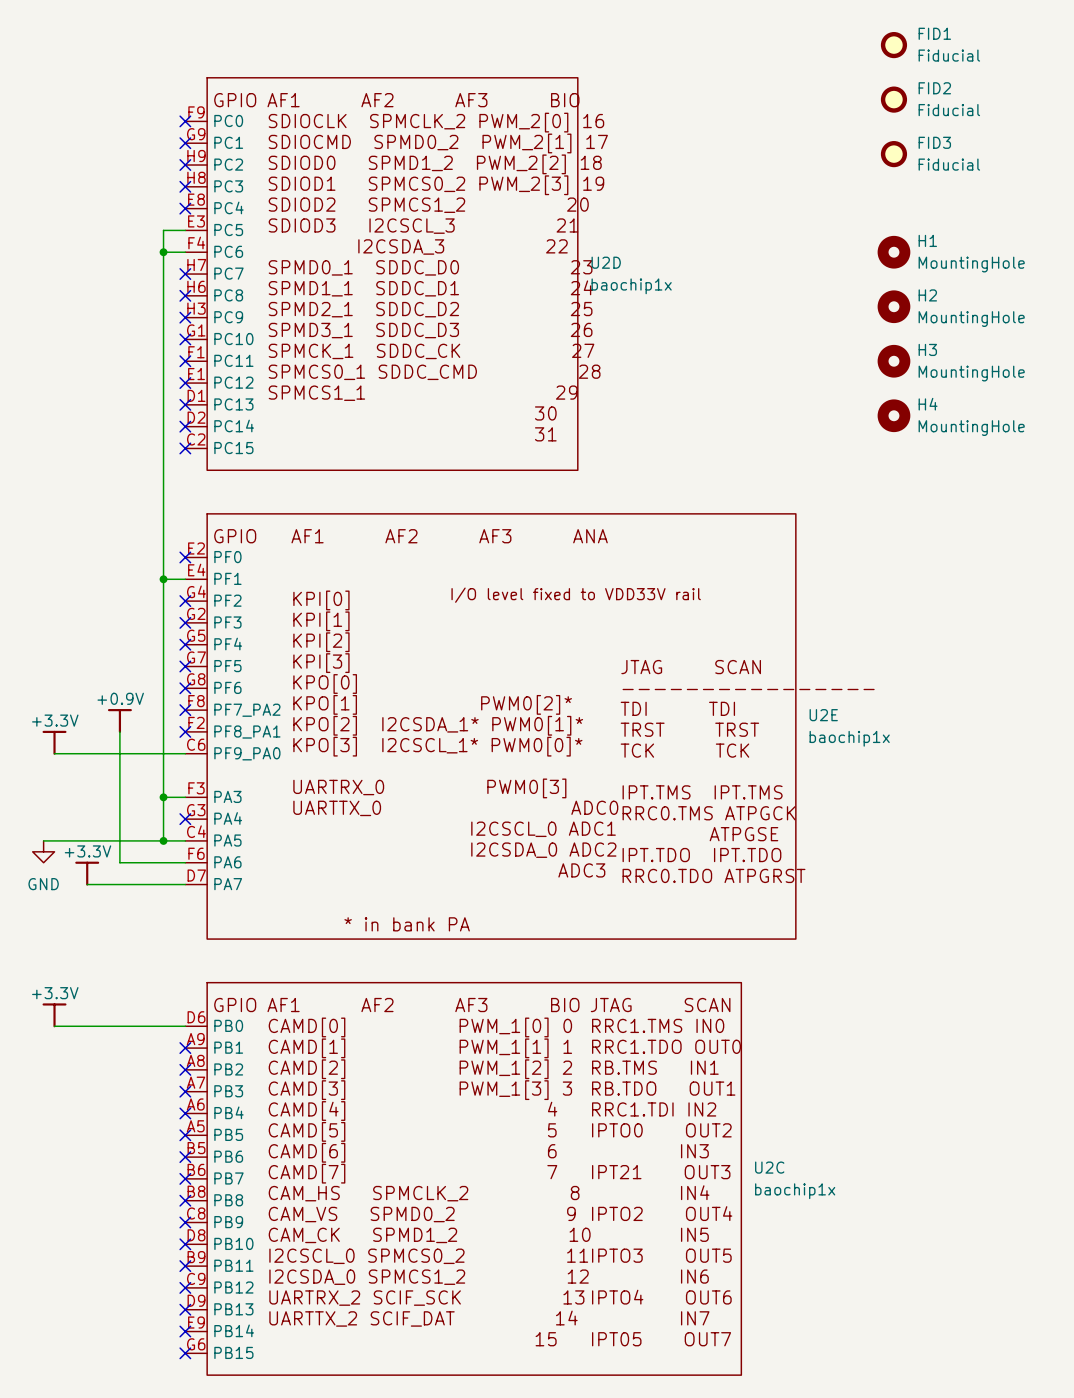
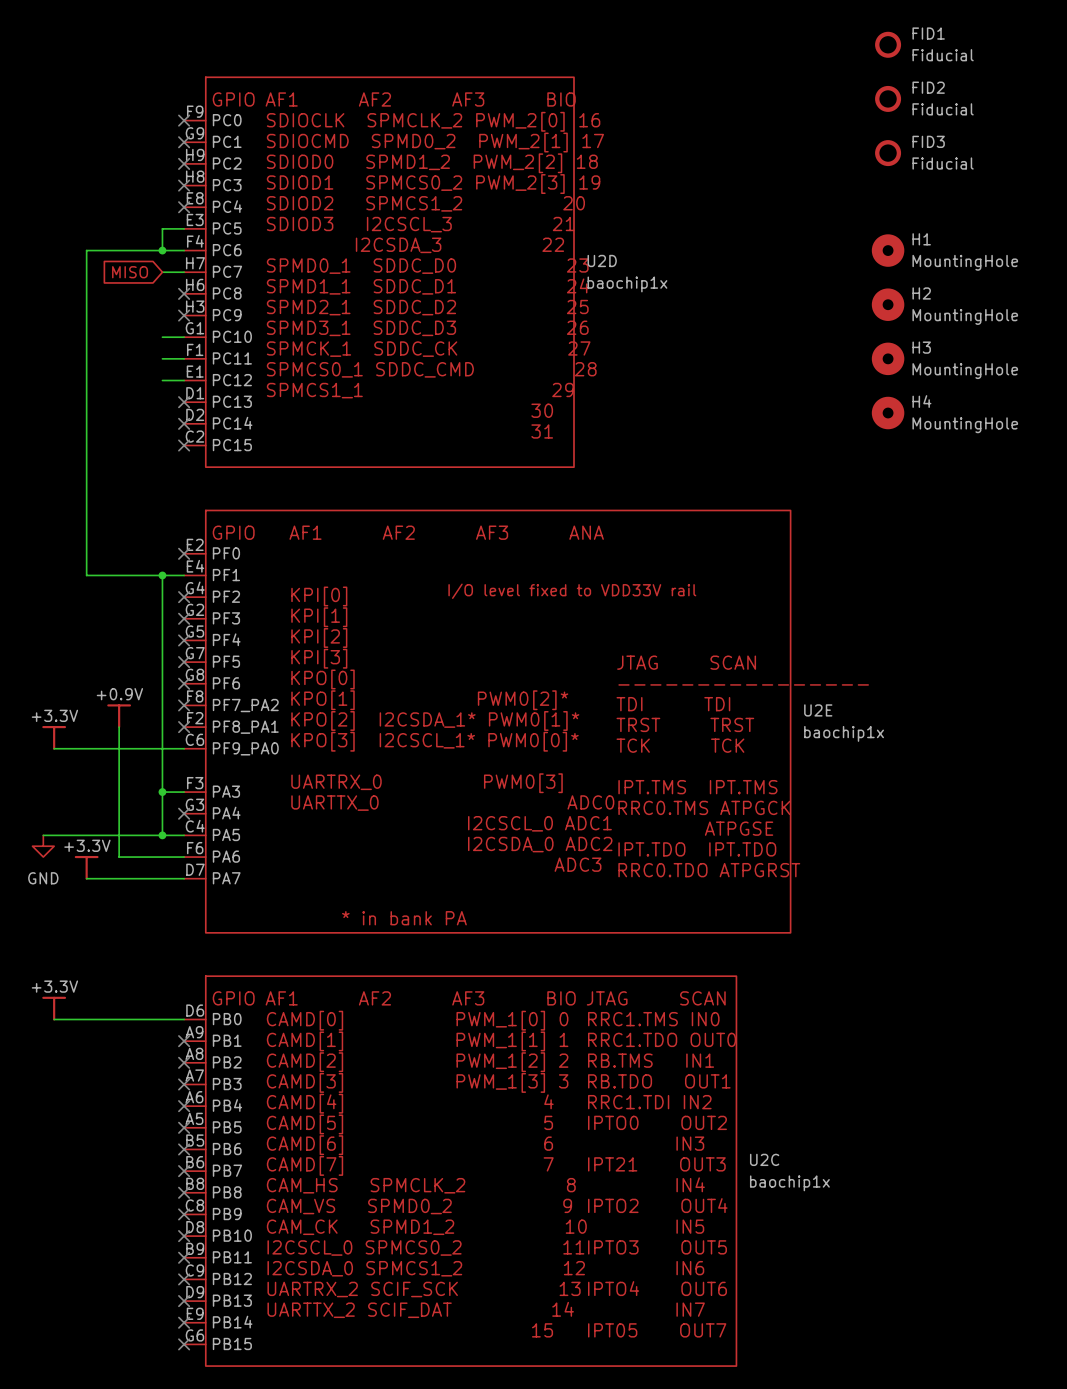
wire: (163, 252) (163, 579) -> (162, 250) (86, 250) (86, 575) (162, 575)
global label: none -> MISO (130, 272)
wire: none -> (162, 272) (184, 272)
no-connect mark: (185, 274) -> none
wire: none -> (162, 337) (184, 337)
no-connect mark: (185, 339) -> none
wire: none -> (162, 358) (184, 358)
no-connect mark: (185, 361) -> none
wire: none -> (162, 380) (184, 380)
no-connect mark: (185, 383) -> none

